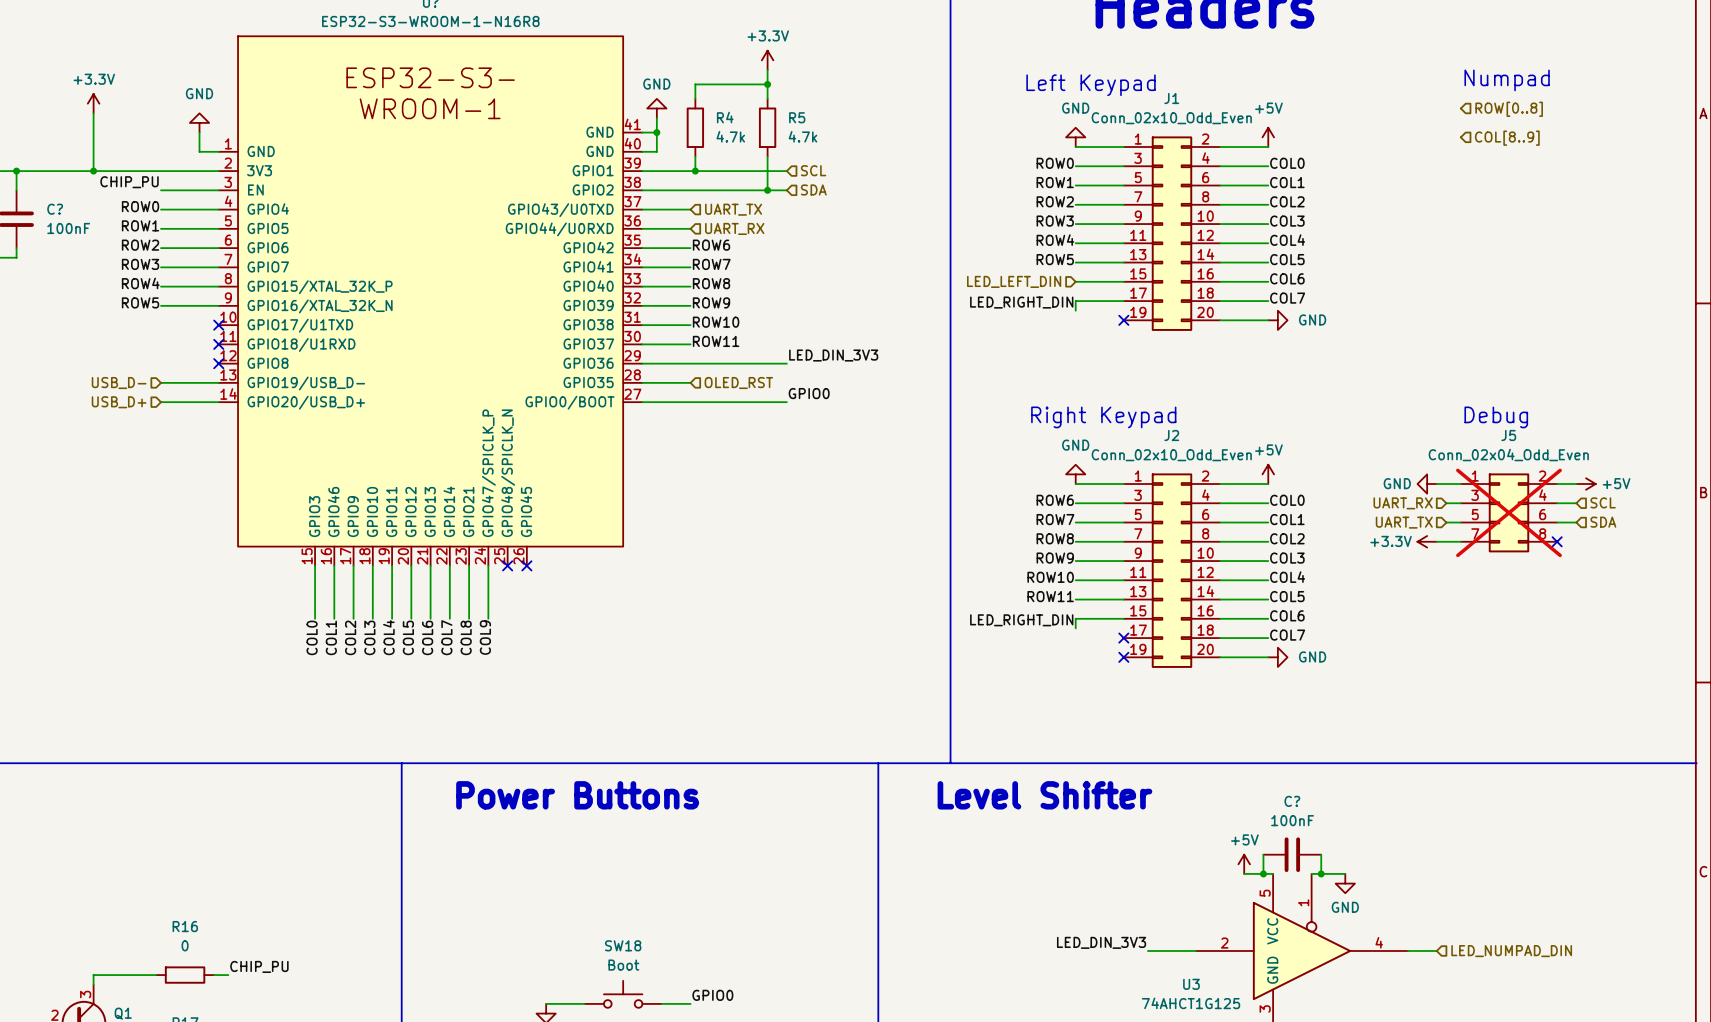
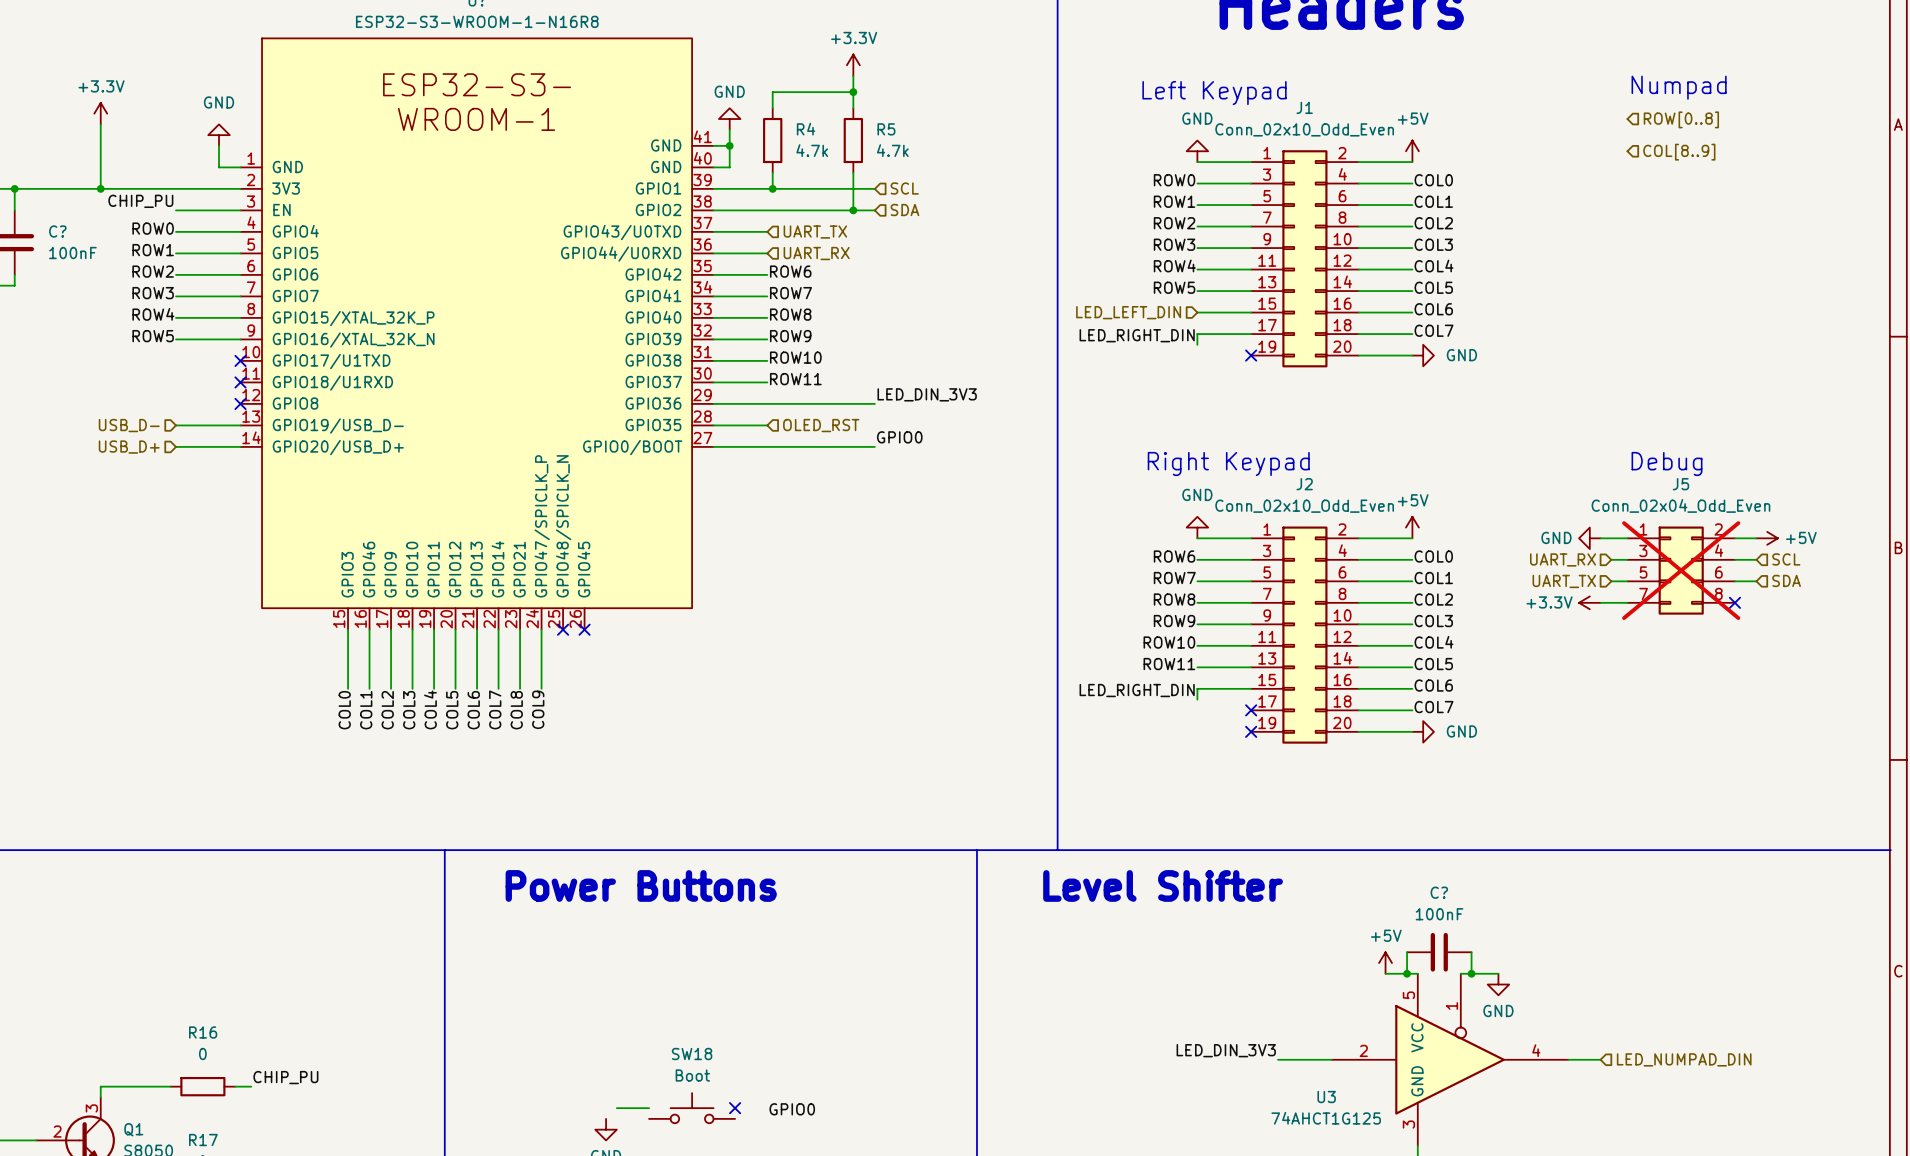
no-connect mark: none -> (735, 1108)
wire: (546, 1003) (584, 1003) -> none
wire: (661, 1003) (690, 1003) -> (616, 1108) (649, 1108)

